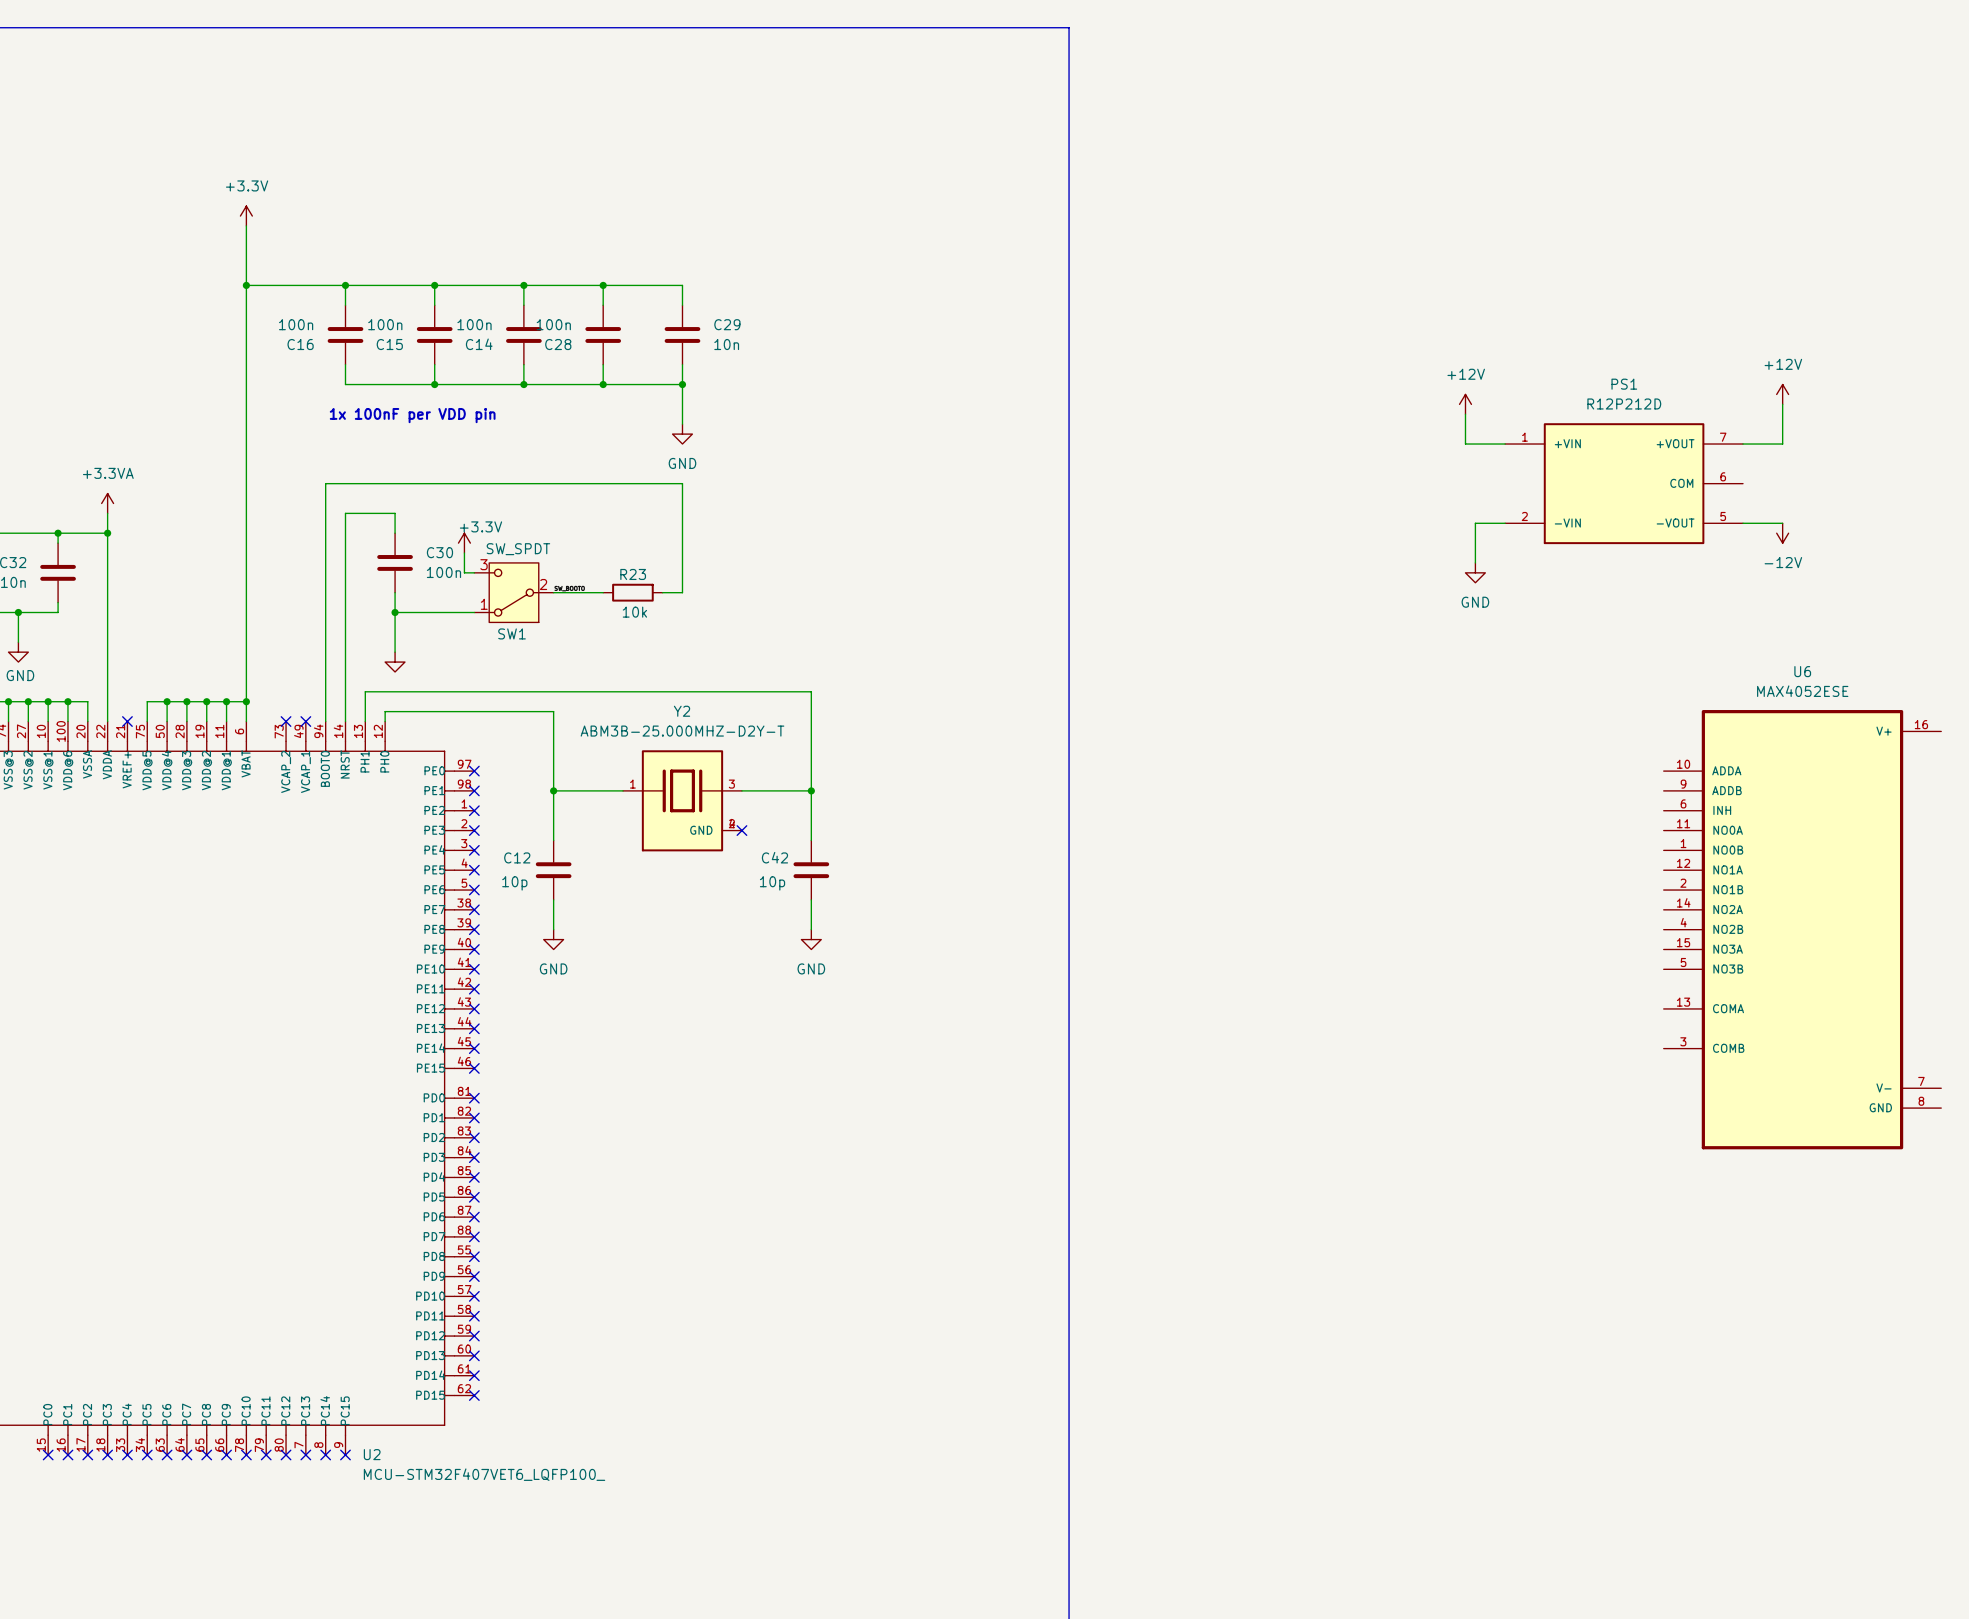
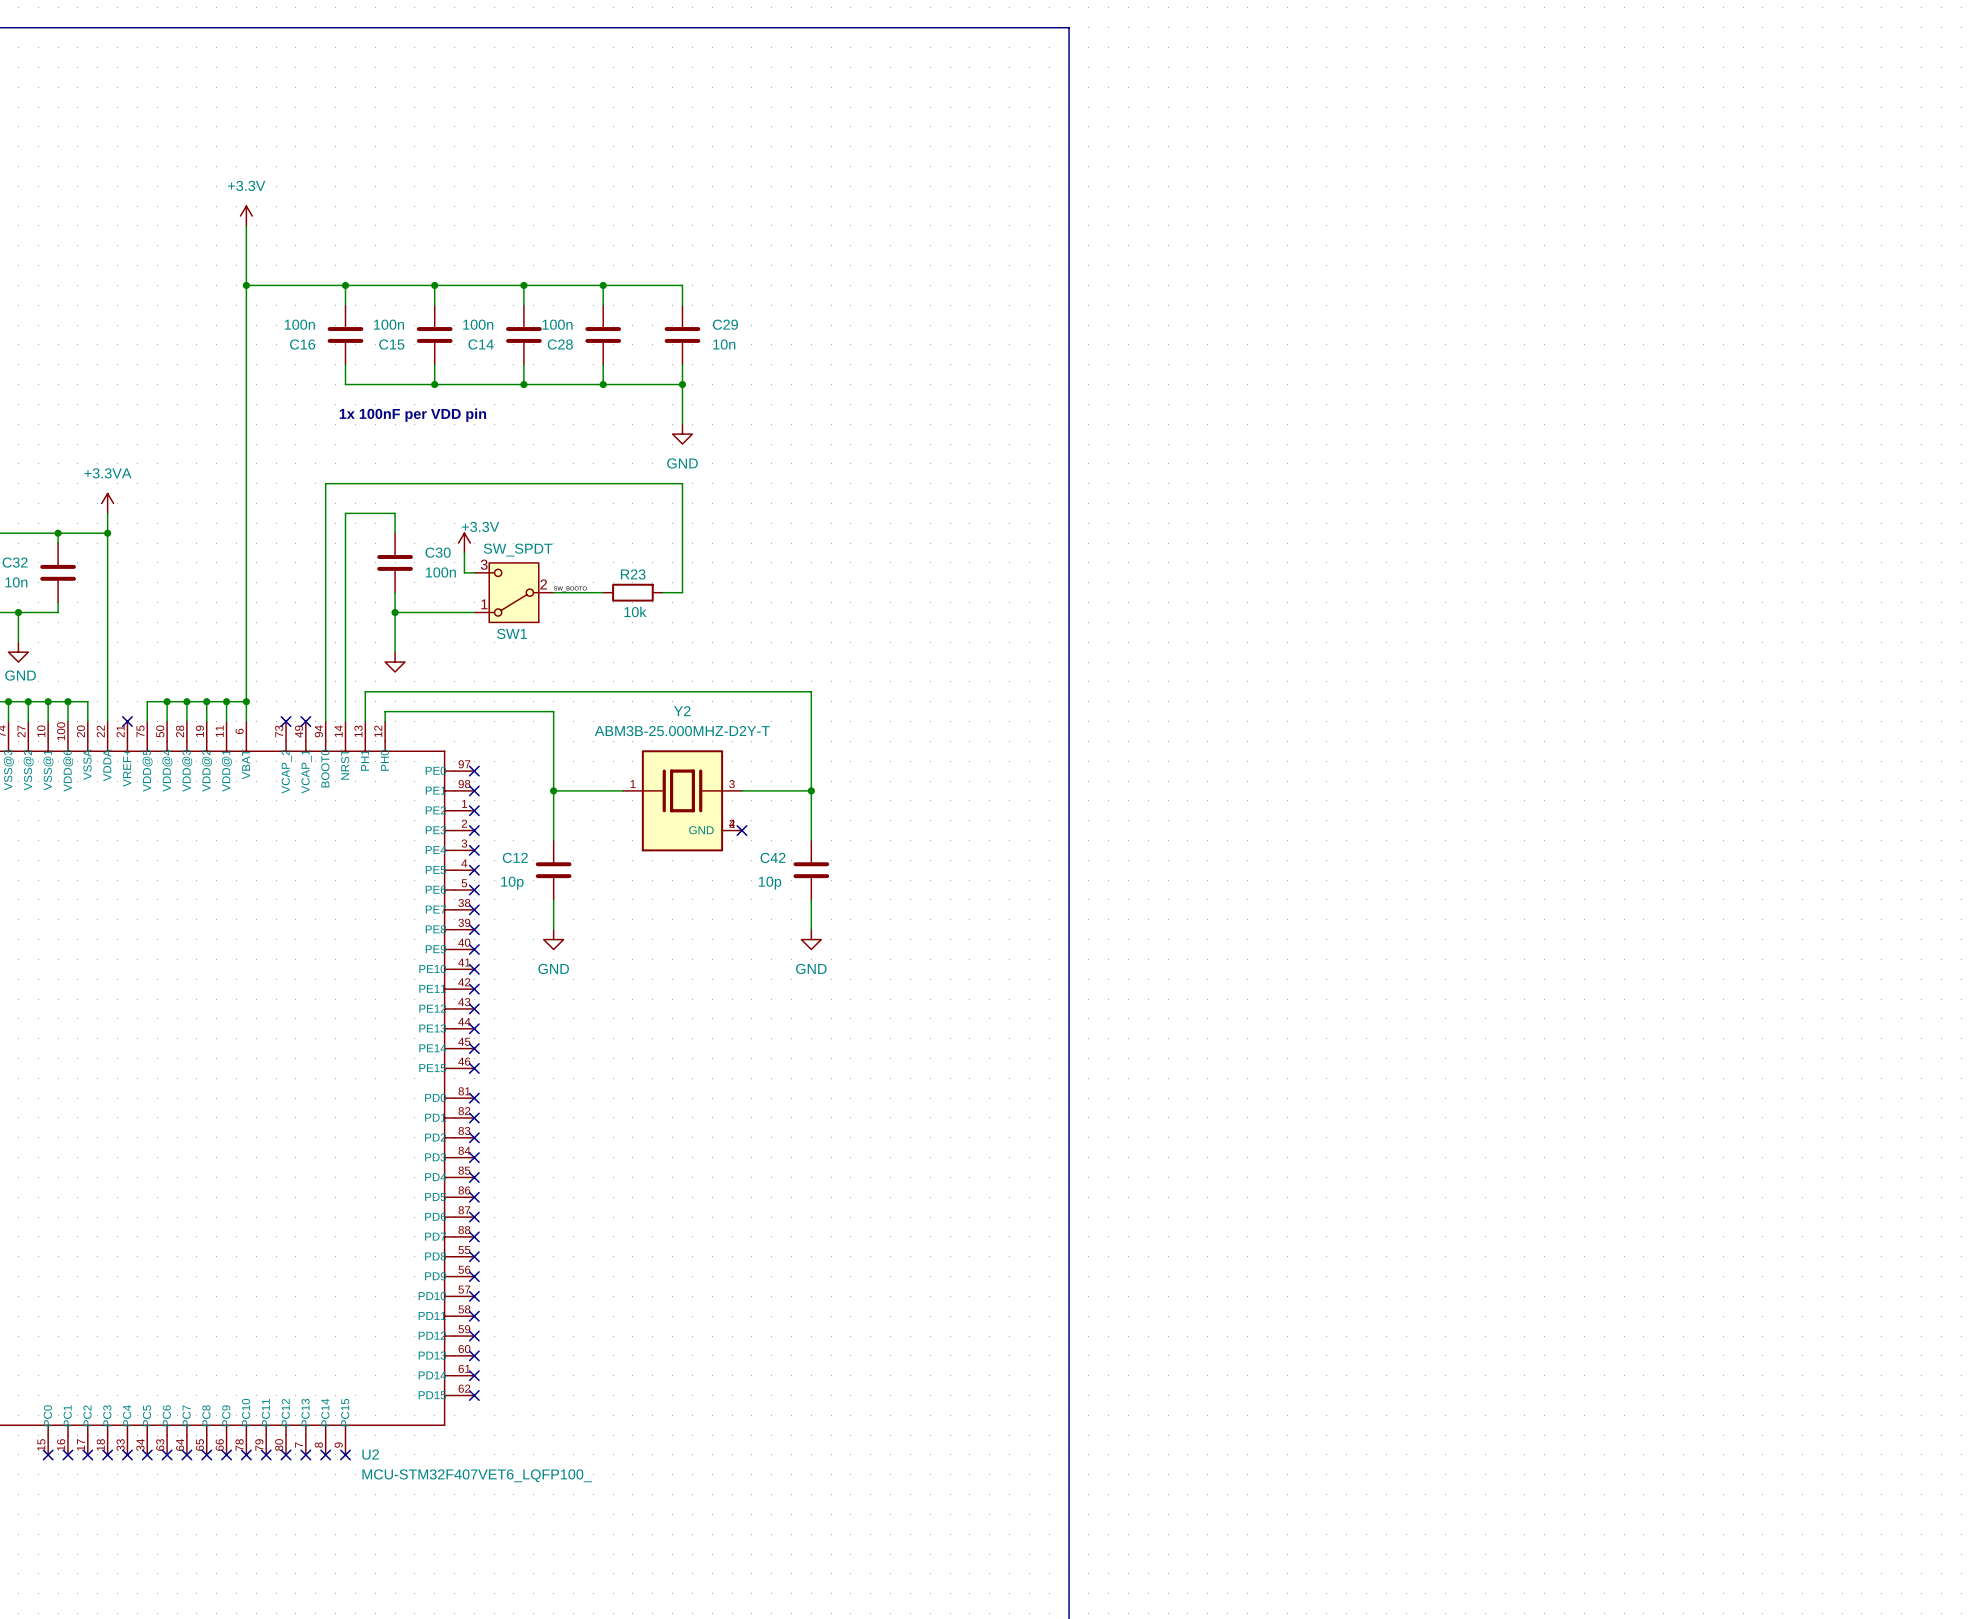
power symbol: +12V (1782, 394) -> none
power symbol: +12V (1465, 404) -> none
wire: (1782, 404) (1782, 444) (1743, 444) -> none
wire: (1465, 414) (1465, 444) (1505, 444) -> none
PS1: R12P212D (1624, 483) -> none
wire: (1505, 523) (1475, 523) (1475, 562) -> none
wire: (1743, 523) (1782, 523) -> none
power symbol: -12V (1782, 533) -> none
power symbol: GND (1475, 572) -> none
U6: MAX4052ESE (1802, 929) -> none

